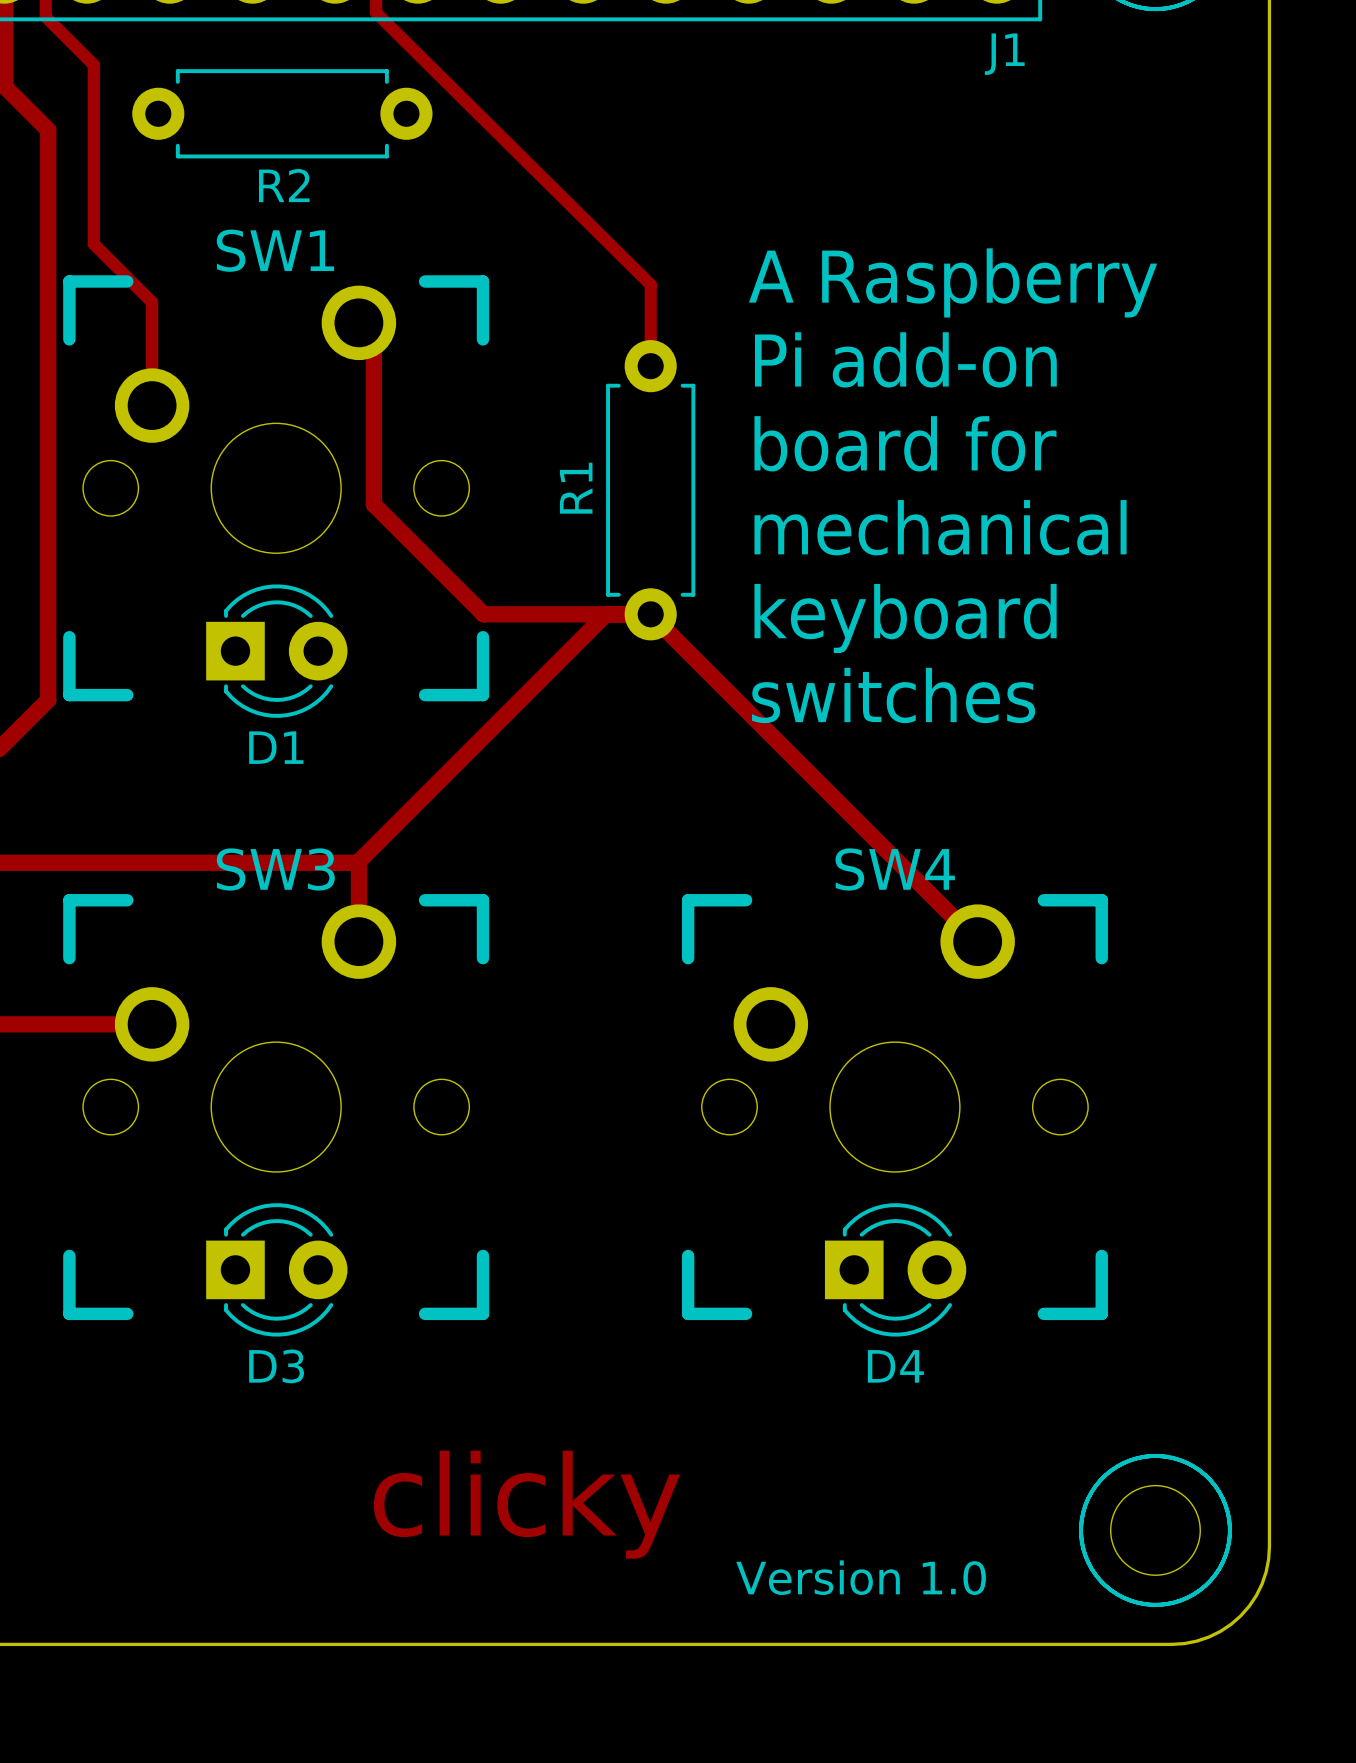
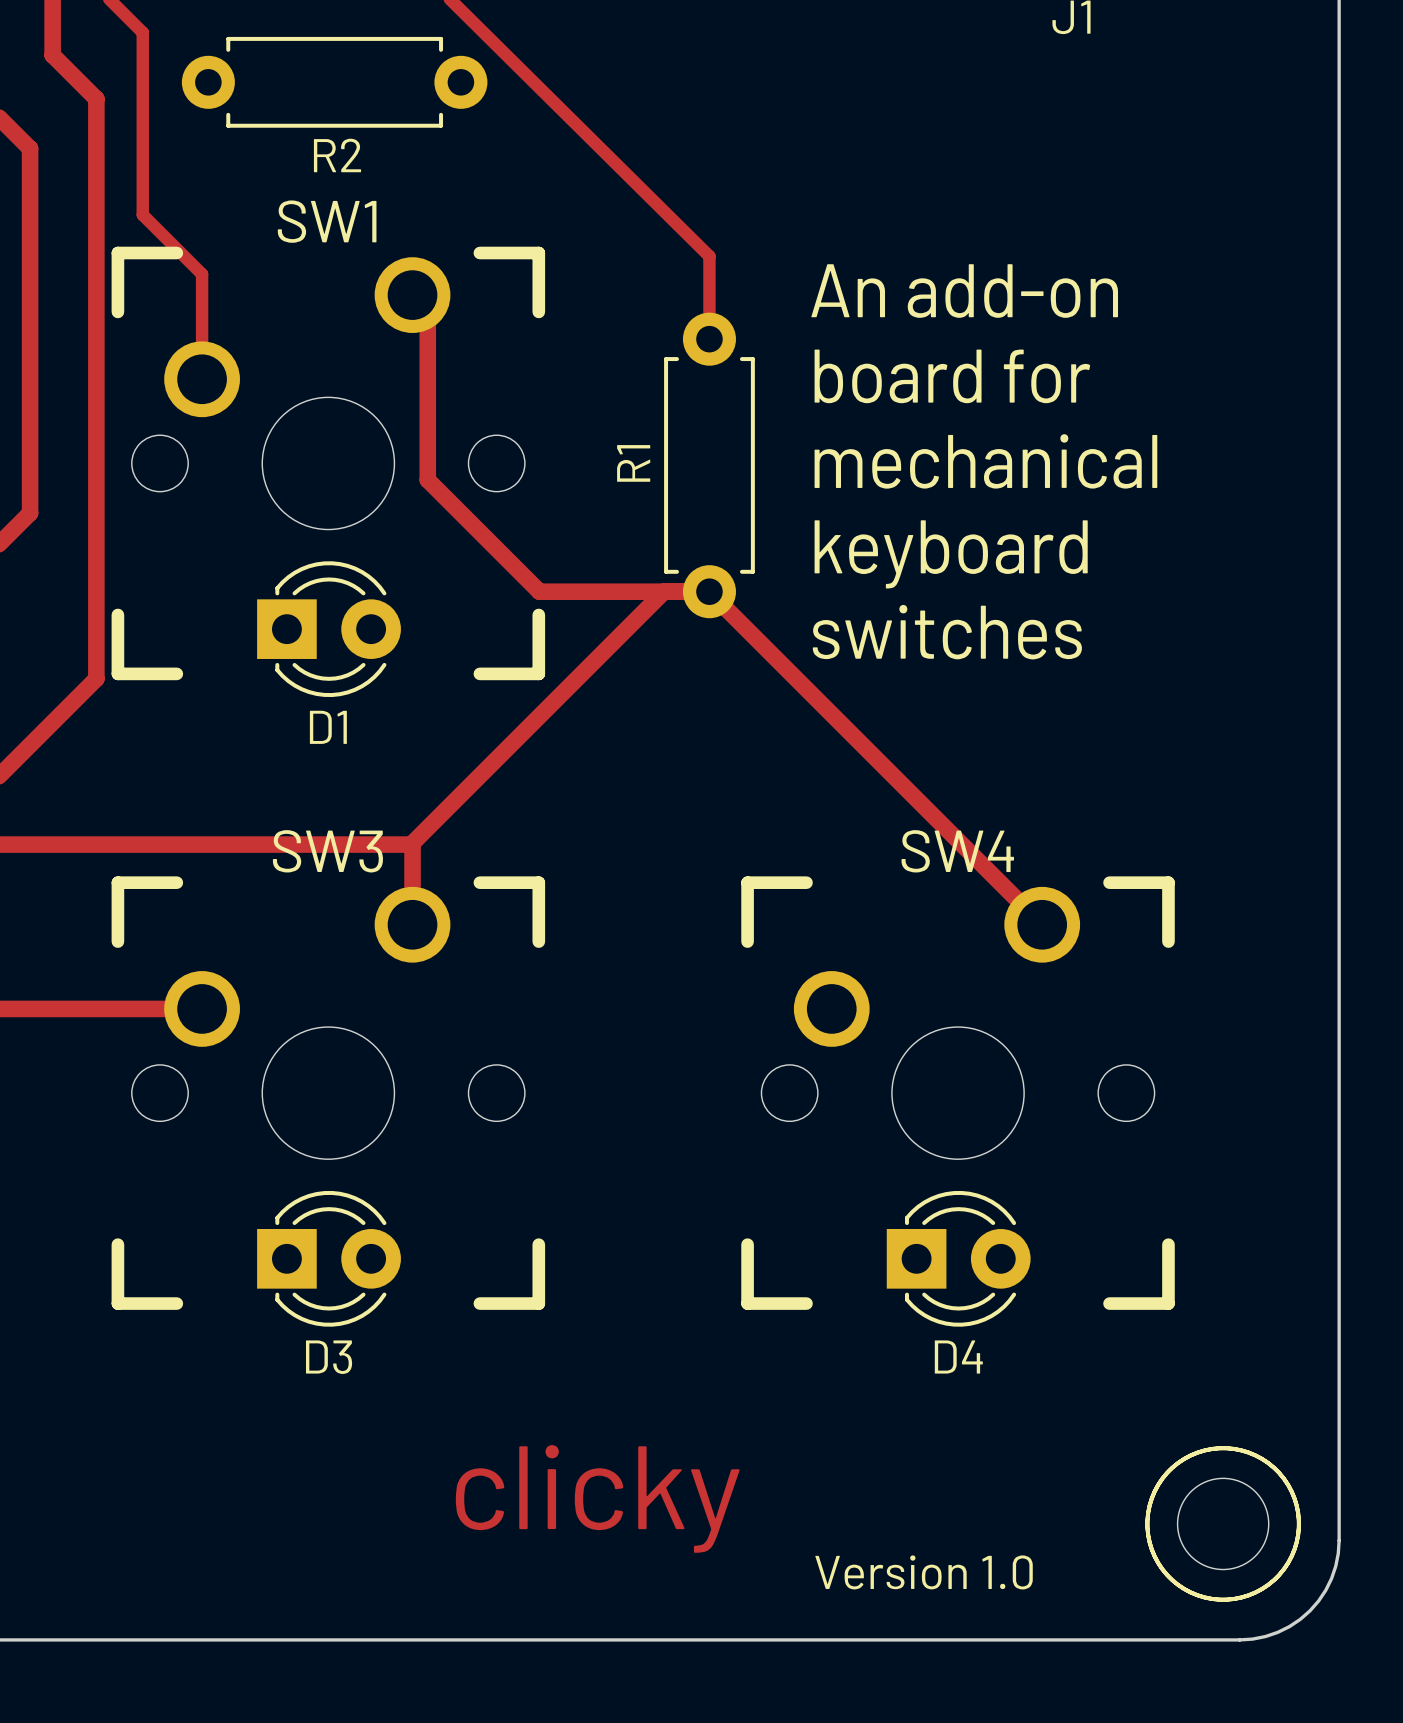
text: A Raspberry (953, 282) -> none
text: Pi add-on (905, 359) -> An add-on (964, 291)
text position: board for (905, 443) -> board for (952, 376)
text position: mechanical (940, 527) -> mechanical (985, 461)
text position: keyboard (905, 618) -> keyboard (951, 554)
text position: switches (893, 695) -> switches (947, 632)

